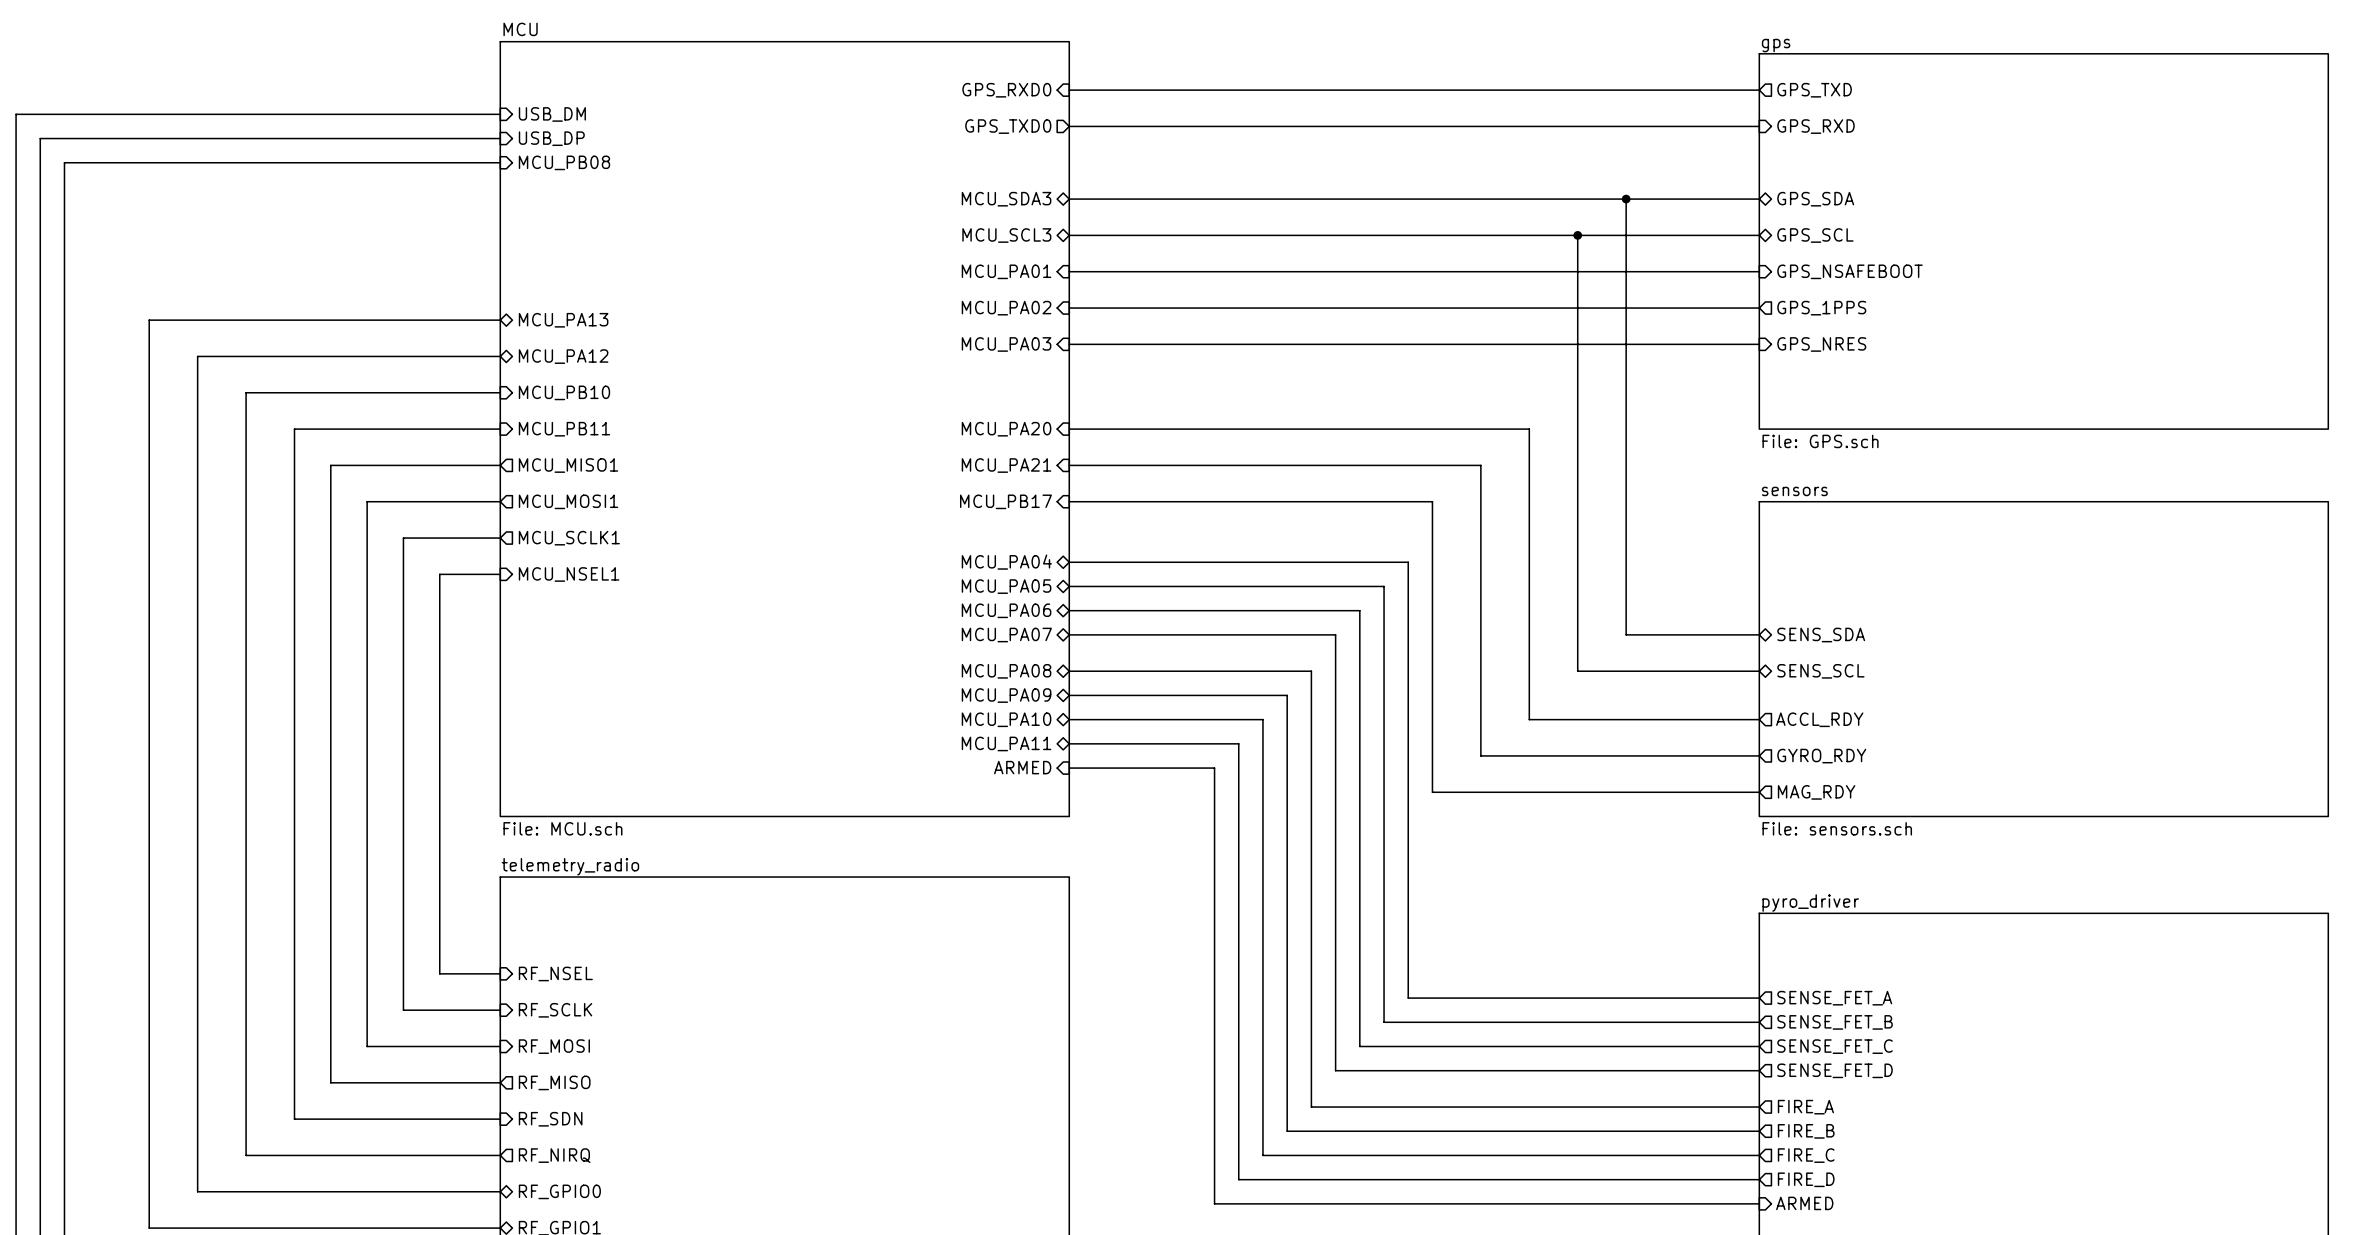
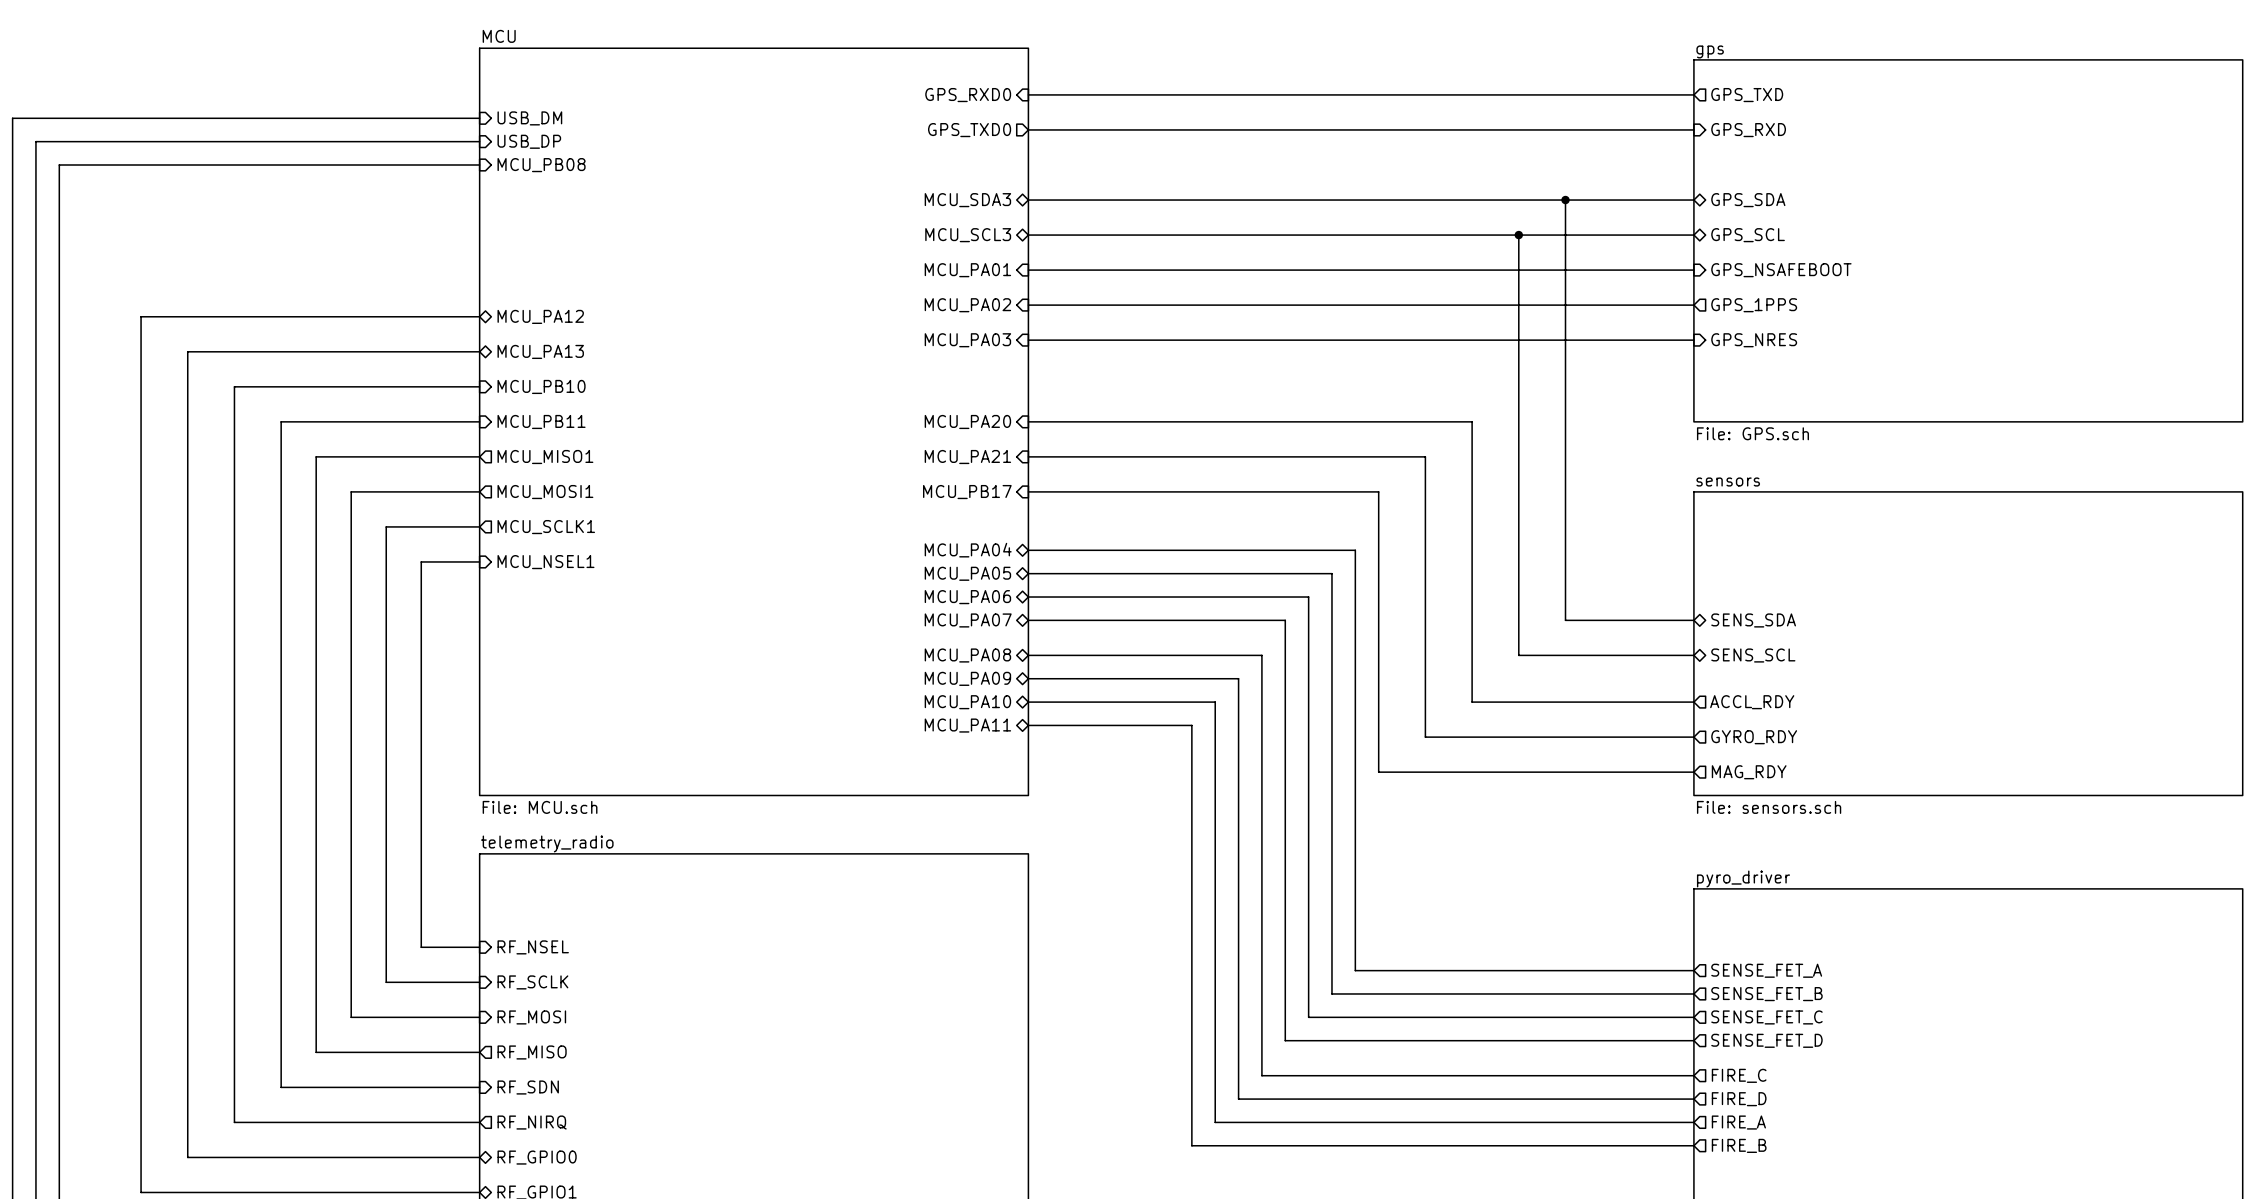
sheet pin: MCU_PA13 (563, 320) -> MCU_PA12 (540, 316)
sheet pin: MCU_PA12 (563, 356) -> MCU_PA13 (540, 351)
sheet pin: ARMED (1022, 767) -> none
wire: (1069, 768) (1214, 768) (1214, 1203) (1759, 1203) -> none
sheet pin: FIRE_A (1805, 1107) -> FIRE_C (1739, 1075)
sheet pin: FIRE_B (1806, 1131) -> FIRE_D (1739, 1099)
sheet pin: FIRE_C (1806, 1155) -> FIRE_A (1738, 1122)
sheet pin: FIRE_D (1806, 1179) -> FIRE_B (1739, 1145)
sheet pin: ARMED (1804, 1203) -> none

